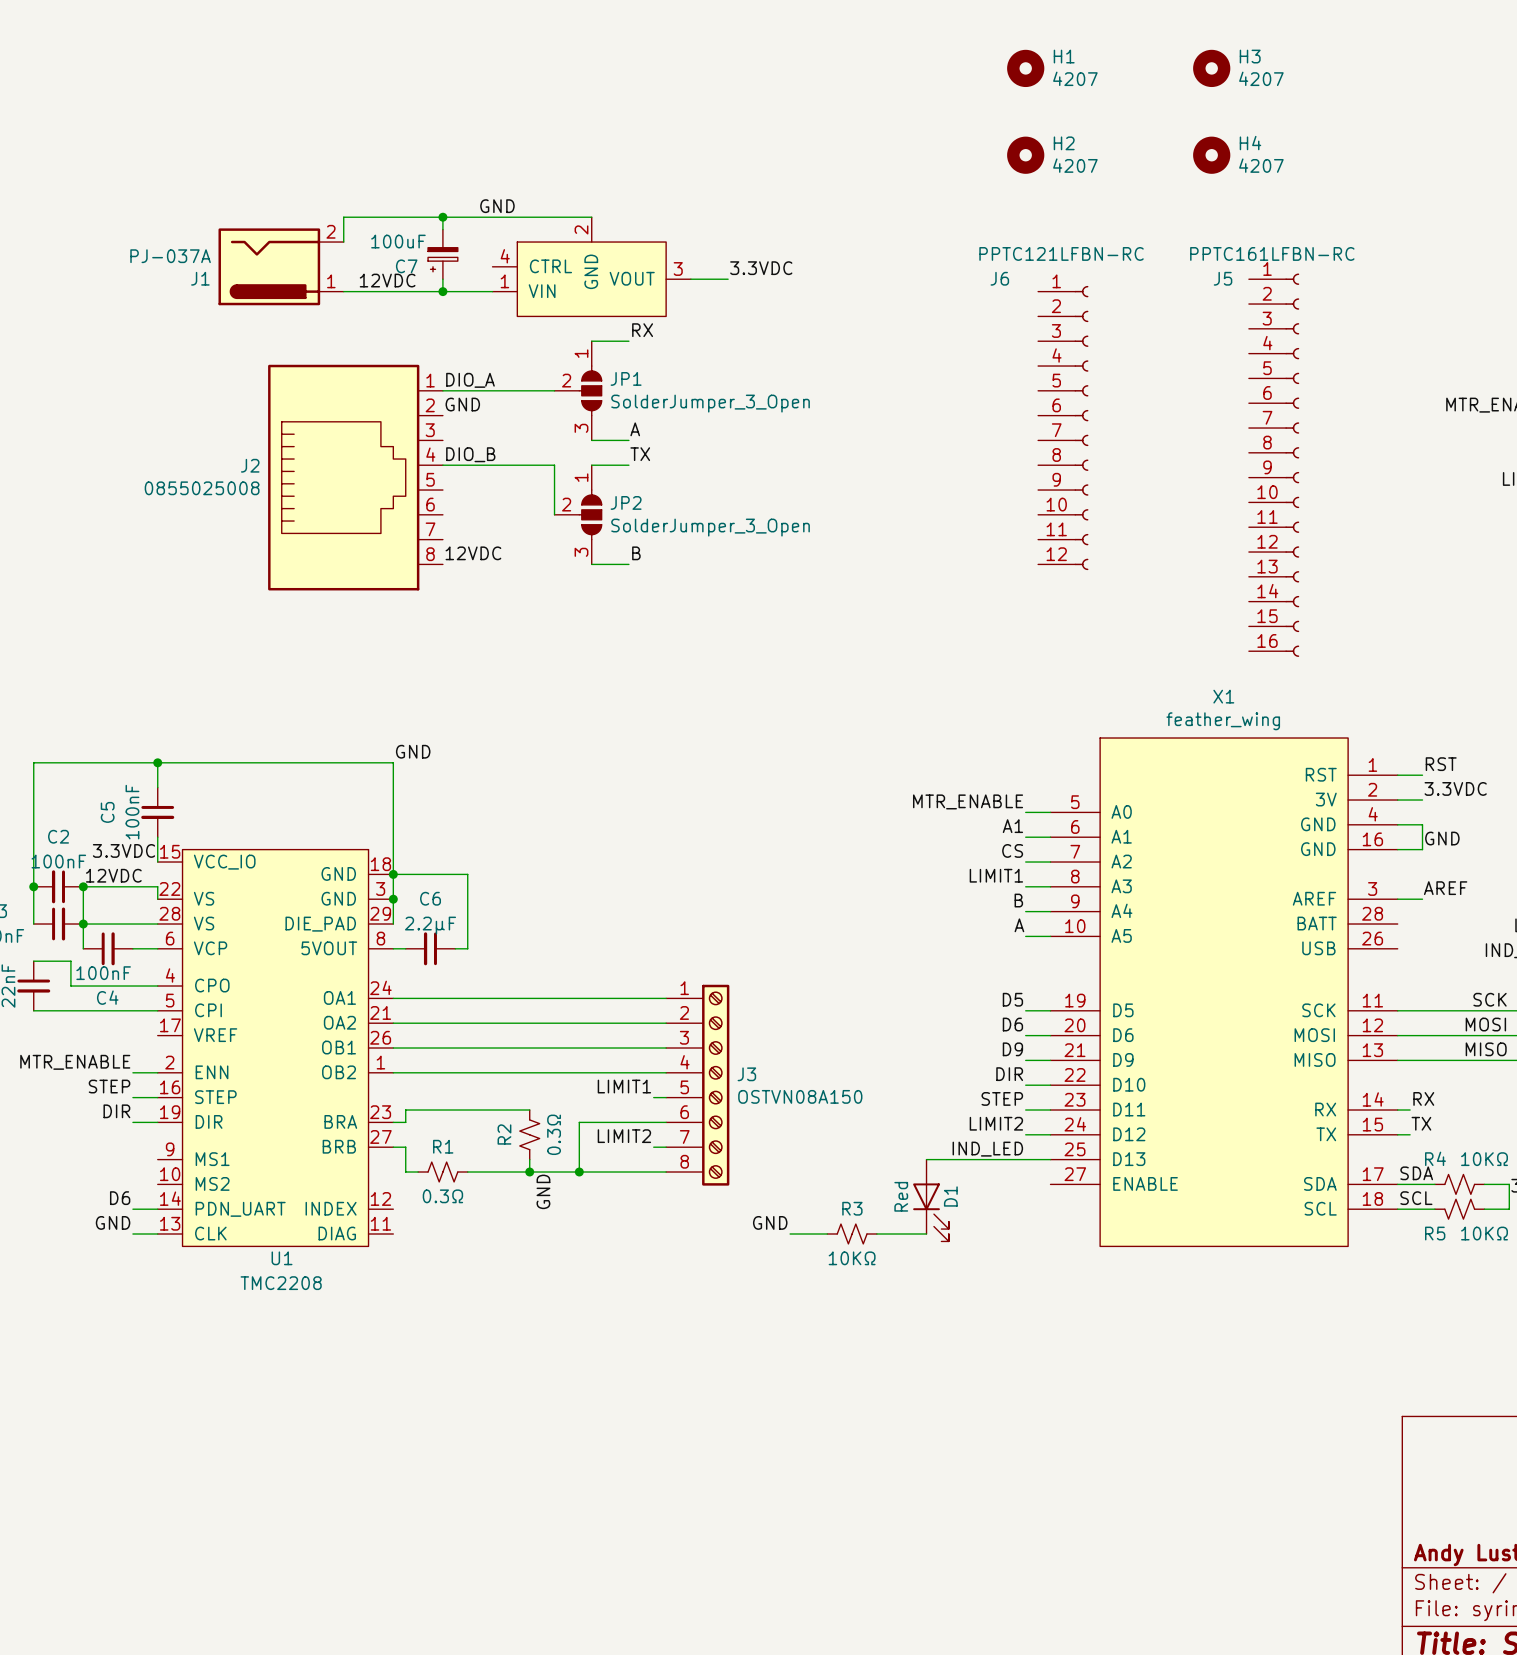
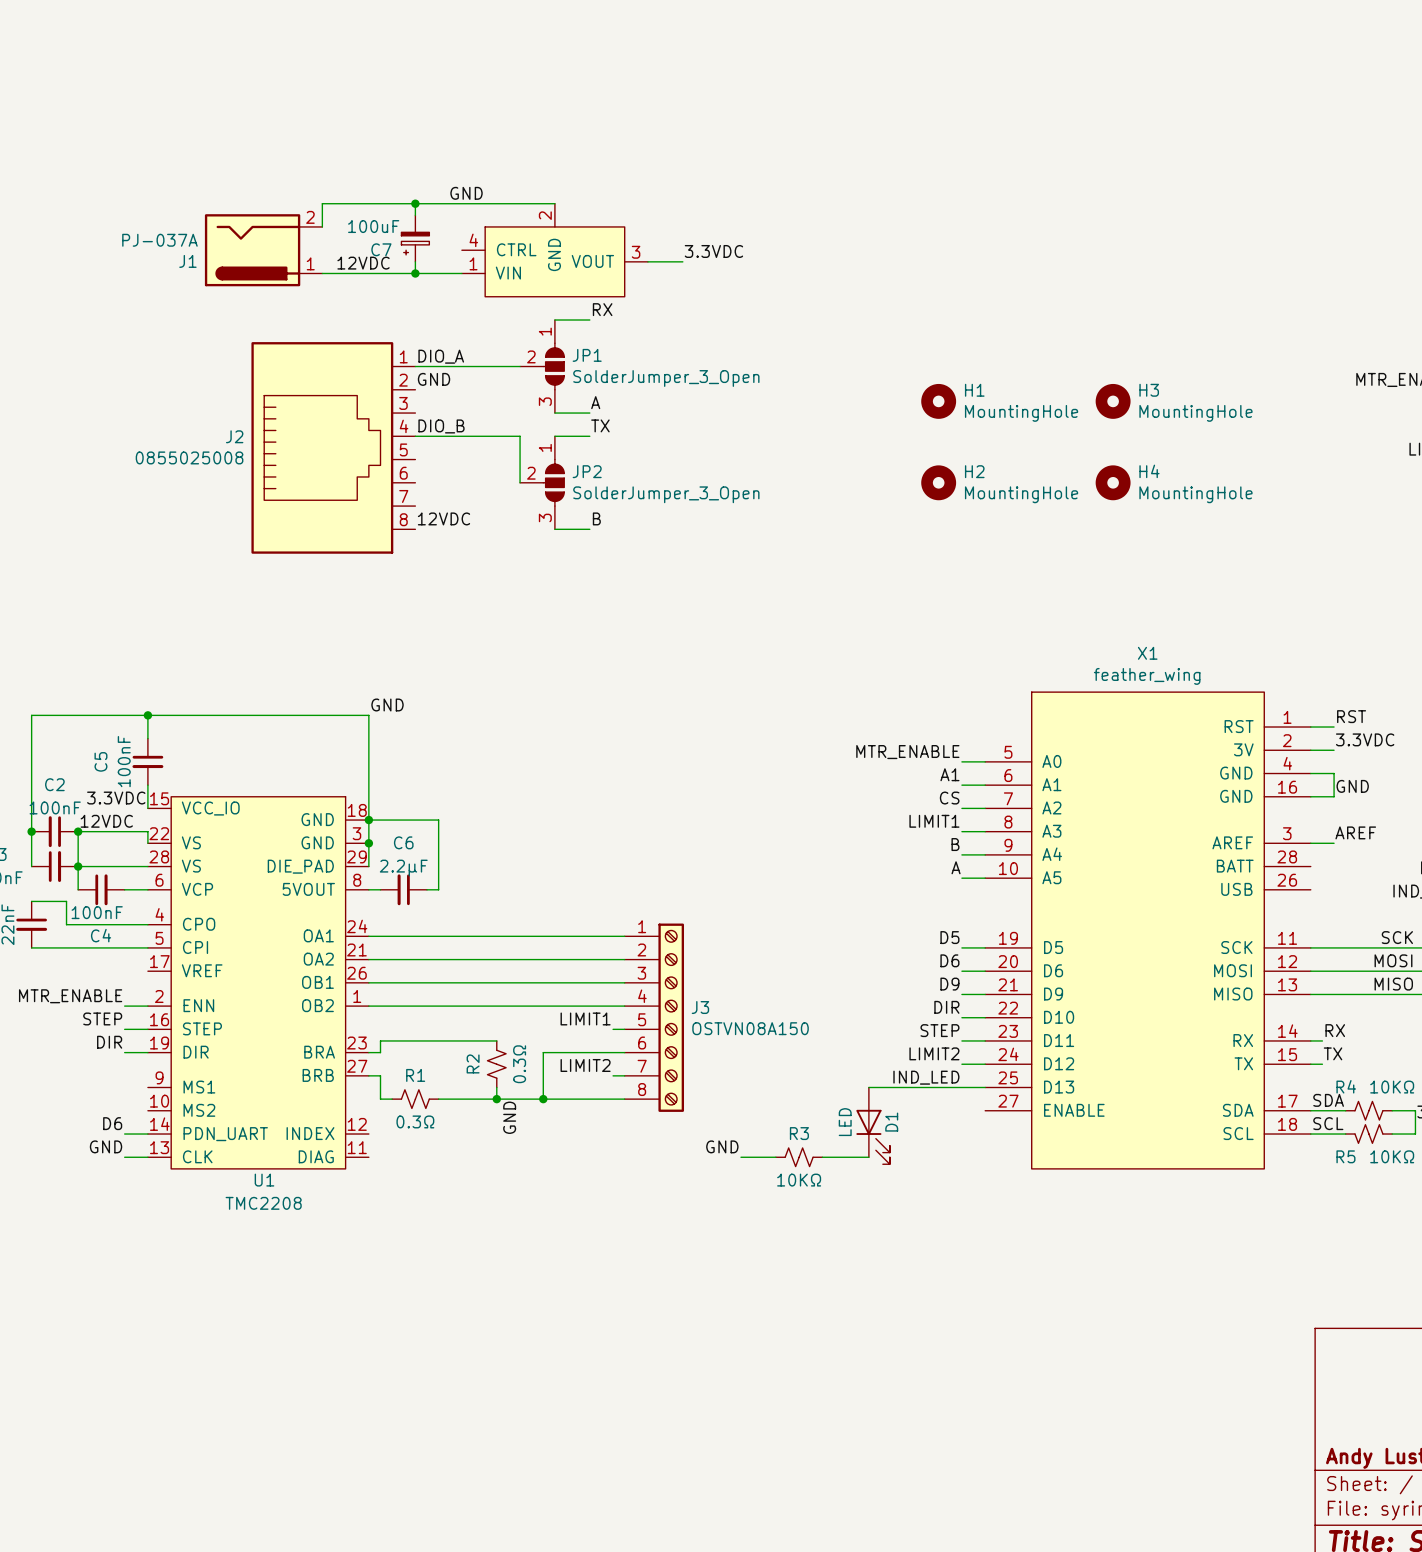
H1 position: (1025, 68) -> (938, 401)
H3 position: (1211, 68) -> (1113, 401)
H1 value: 4207 (1075, 78) -> MountingHole (1021, 413)
H3 value: 4207 (1261, 78) -> MountingHole (1195, 413)
H2 position: (1025, 155) -> (938, 482)
H4 position: (1211, 155) -> (1113, 482)
H2 value: 4207 (1075, 165) -> MountingHole (1021, 494)
H4 value: 4207 (1261, 165) -> MountingHole (1195, 494)
J6: PPTC121LFBN-RC (1063, 428) -> none
J5: PPTC161LFBN-RC (1274, 465) -> none
D1 value: Red (901, 1196) -> LED (845, 1122)

